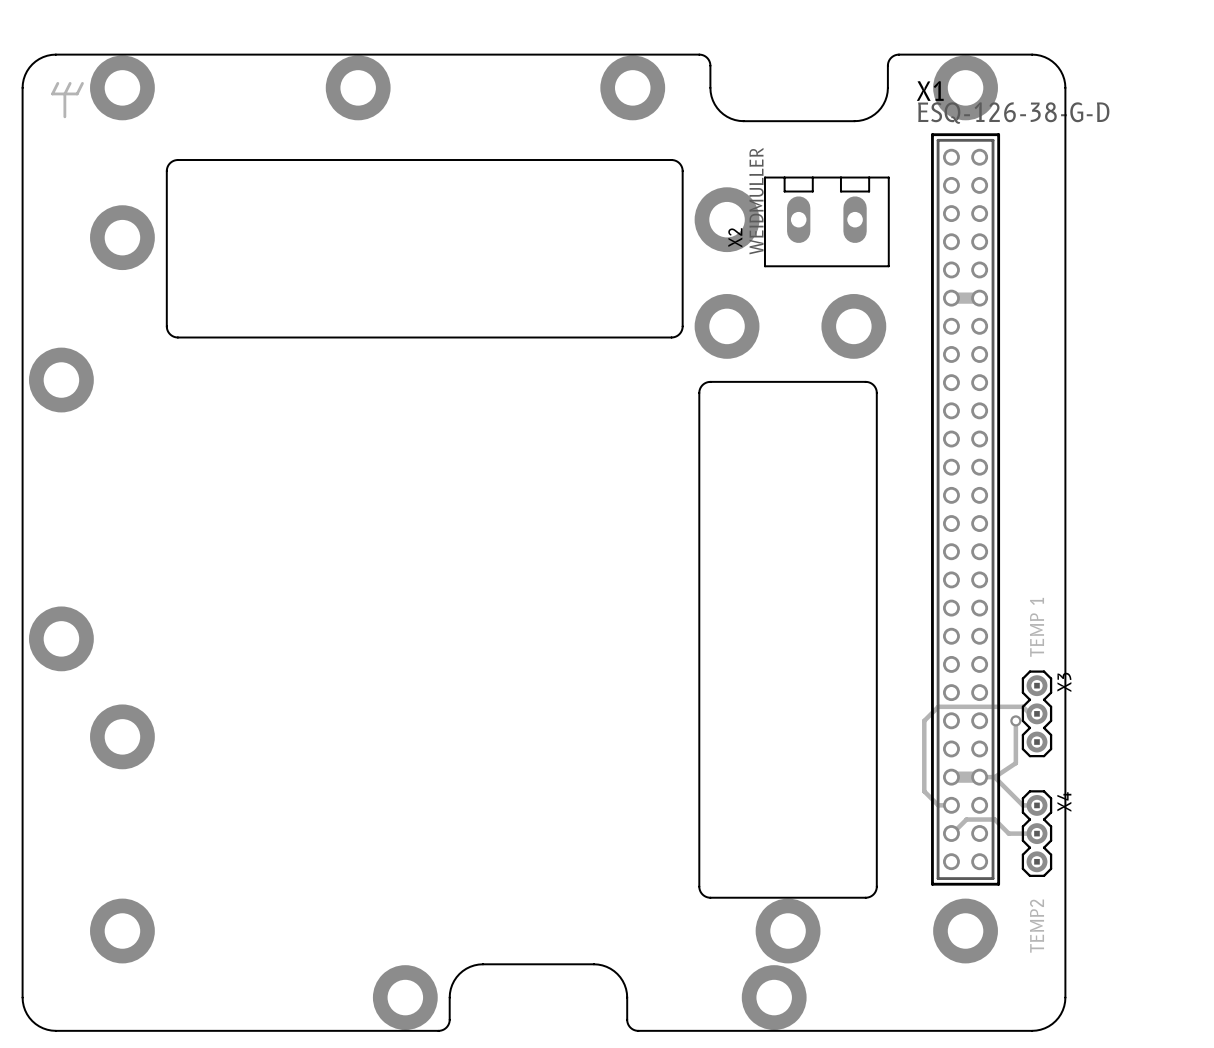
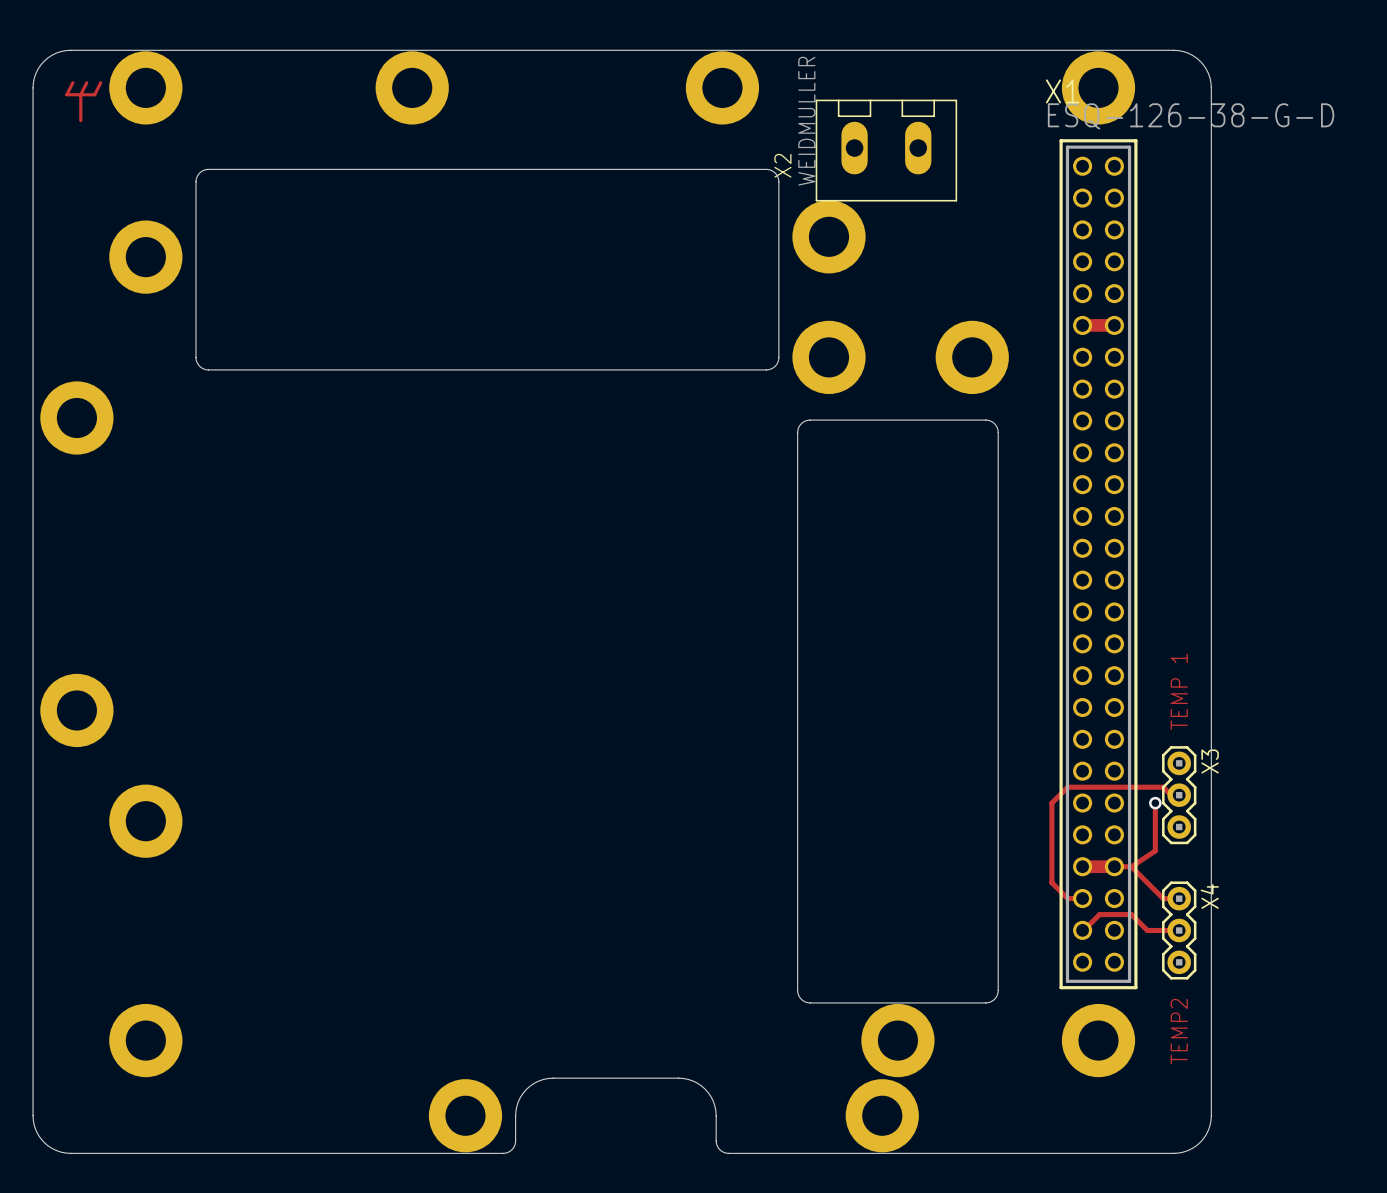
board edge: (699, 54) (706, 56) (710, 62) (710, 92) (714, 104) (727, 116) (743, 121) (854, 121) (867, 118) (874, 114) (883, 104) (887, 92) (888, 62) (892, 56) (898, 54) -> (797, 50) (1023, 50)
X2 position: (826, 221) -> (886, 150)

